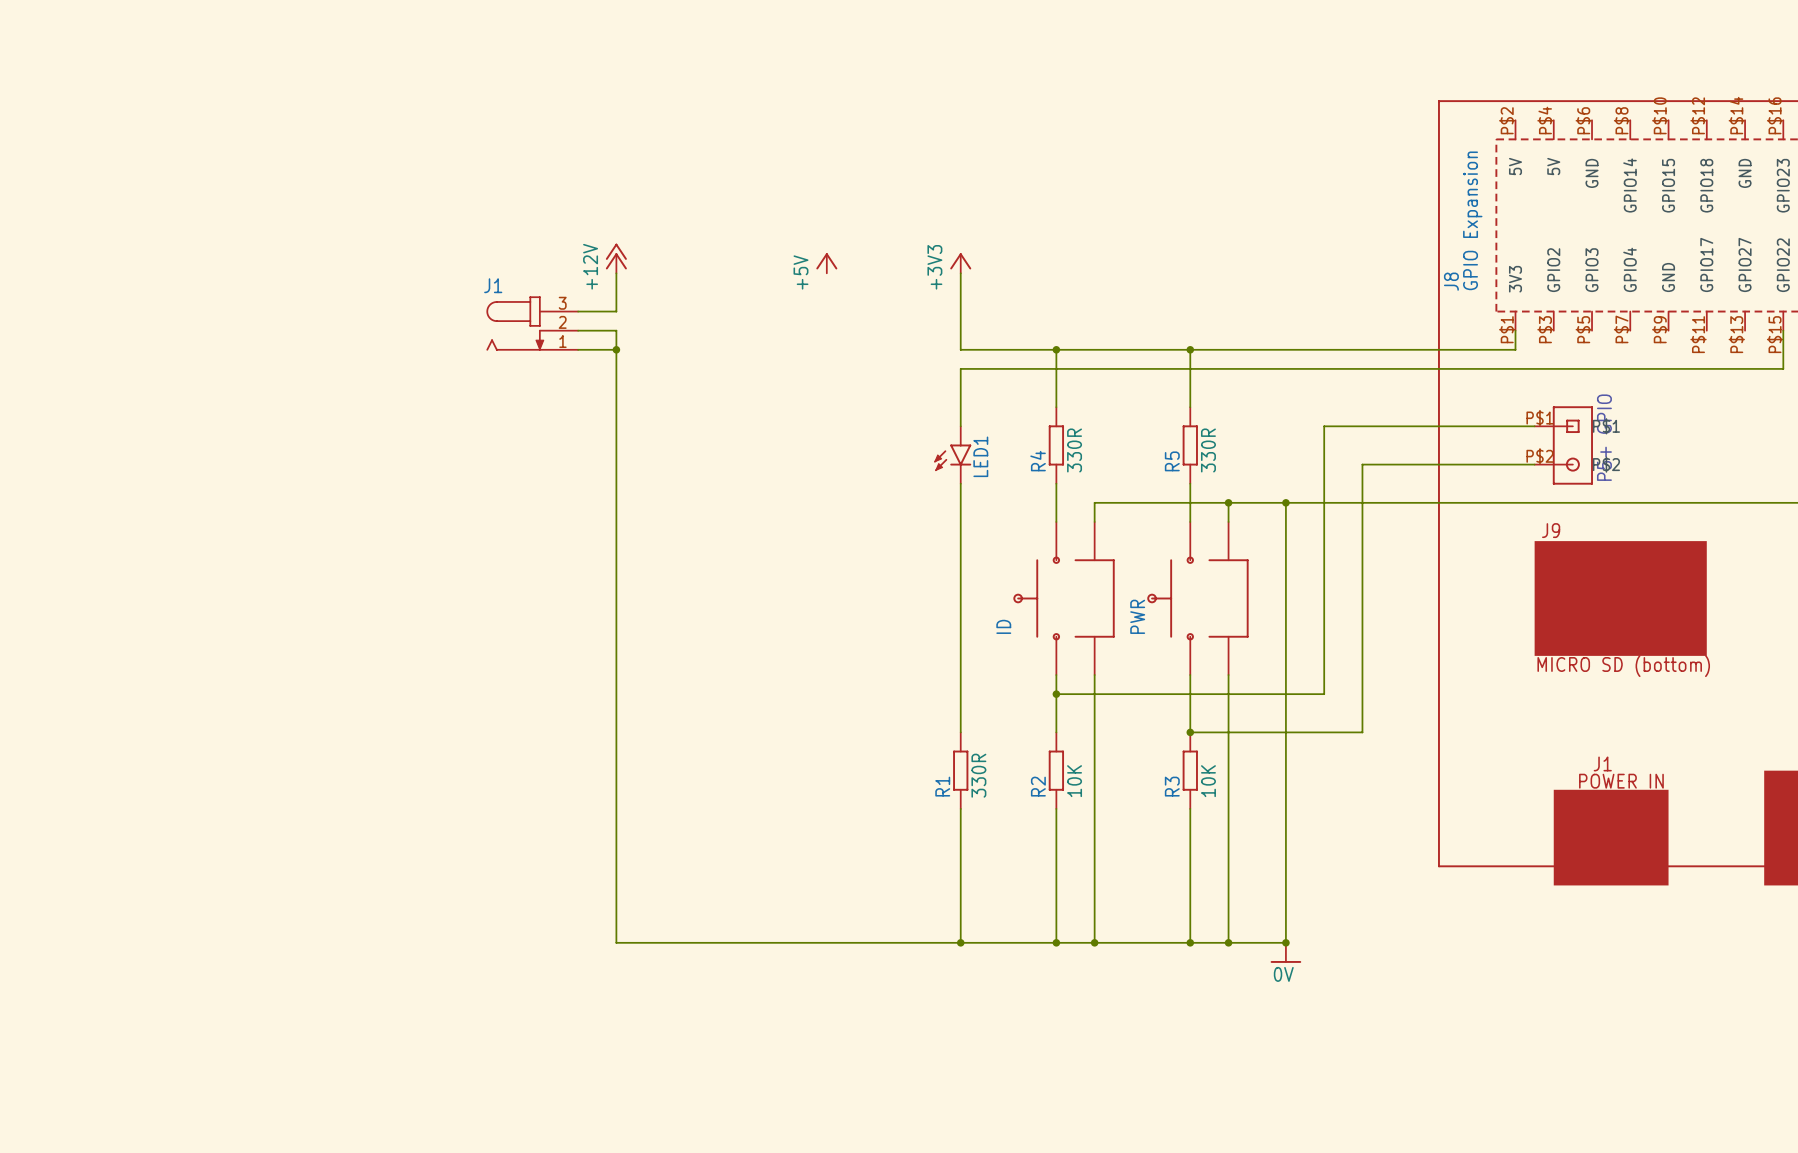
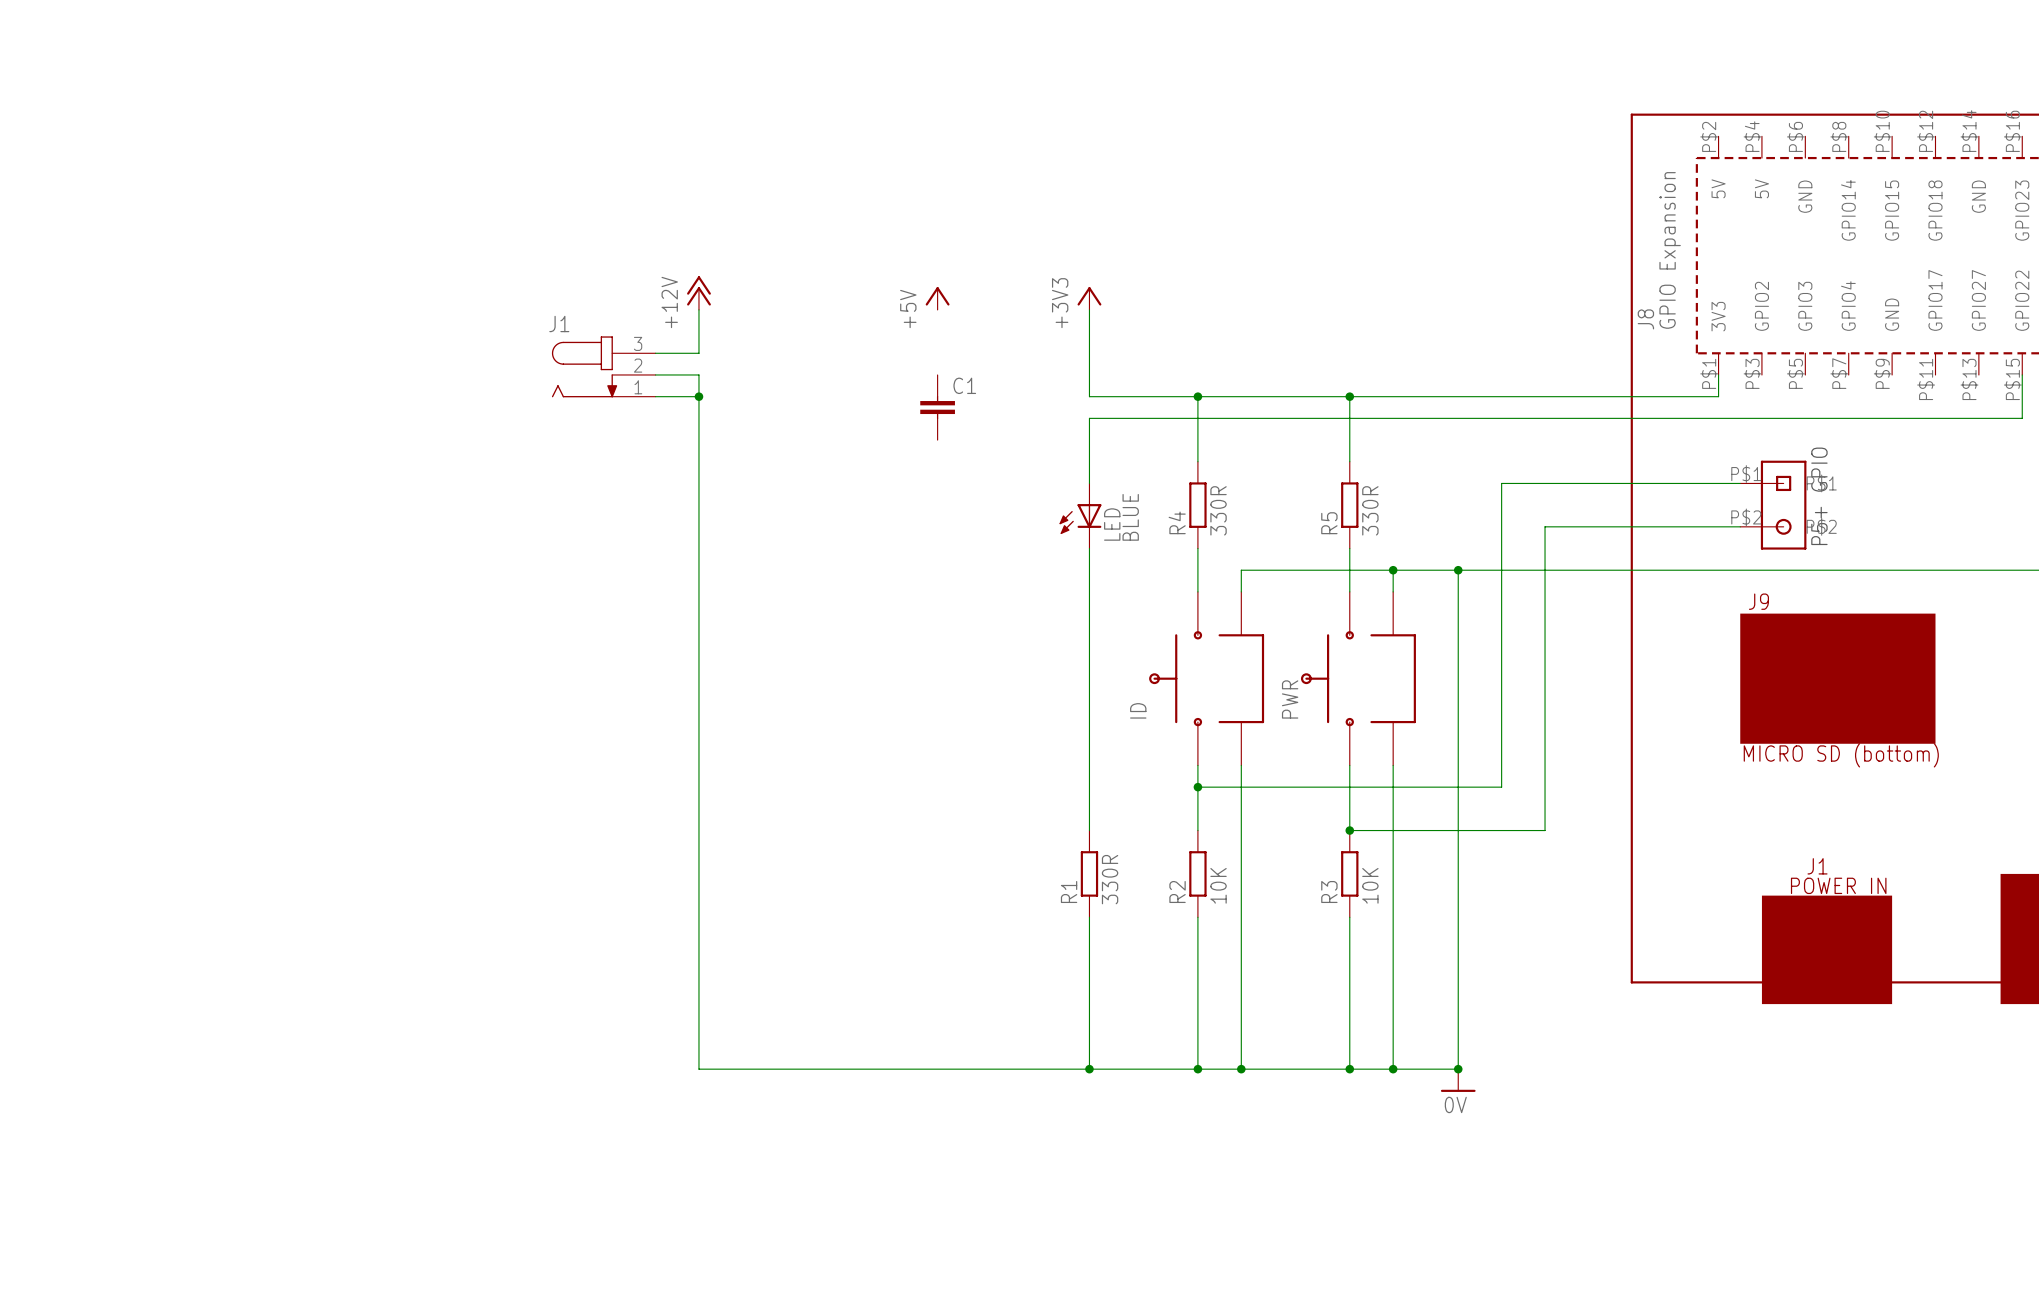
C1: none -> (937, 407)
LED1: (952, 455) -> none
LED: none -> BLUE (1080, 515)

